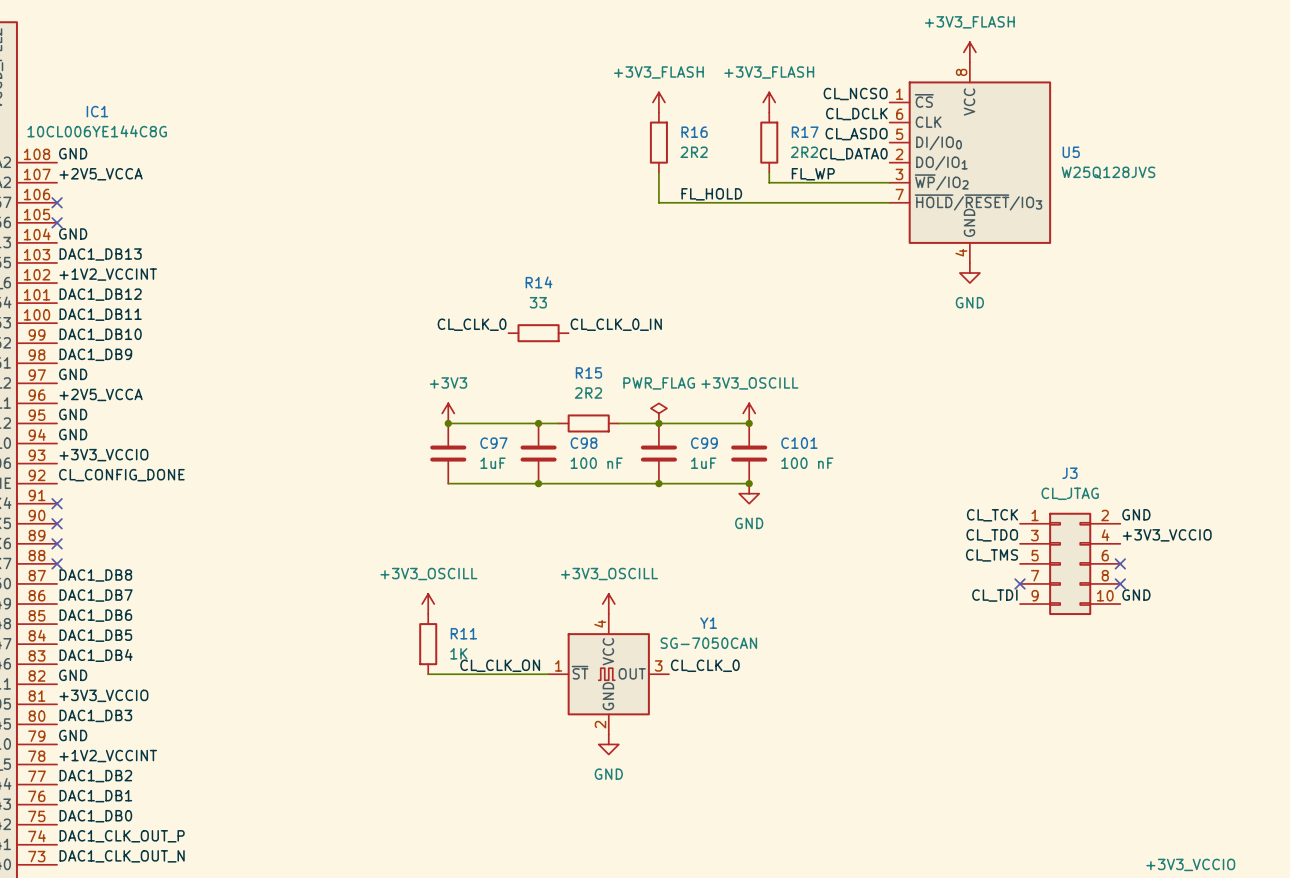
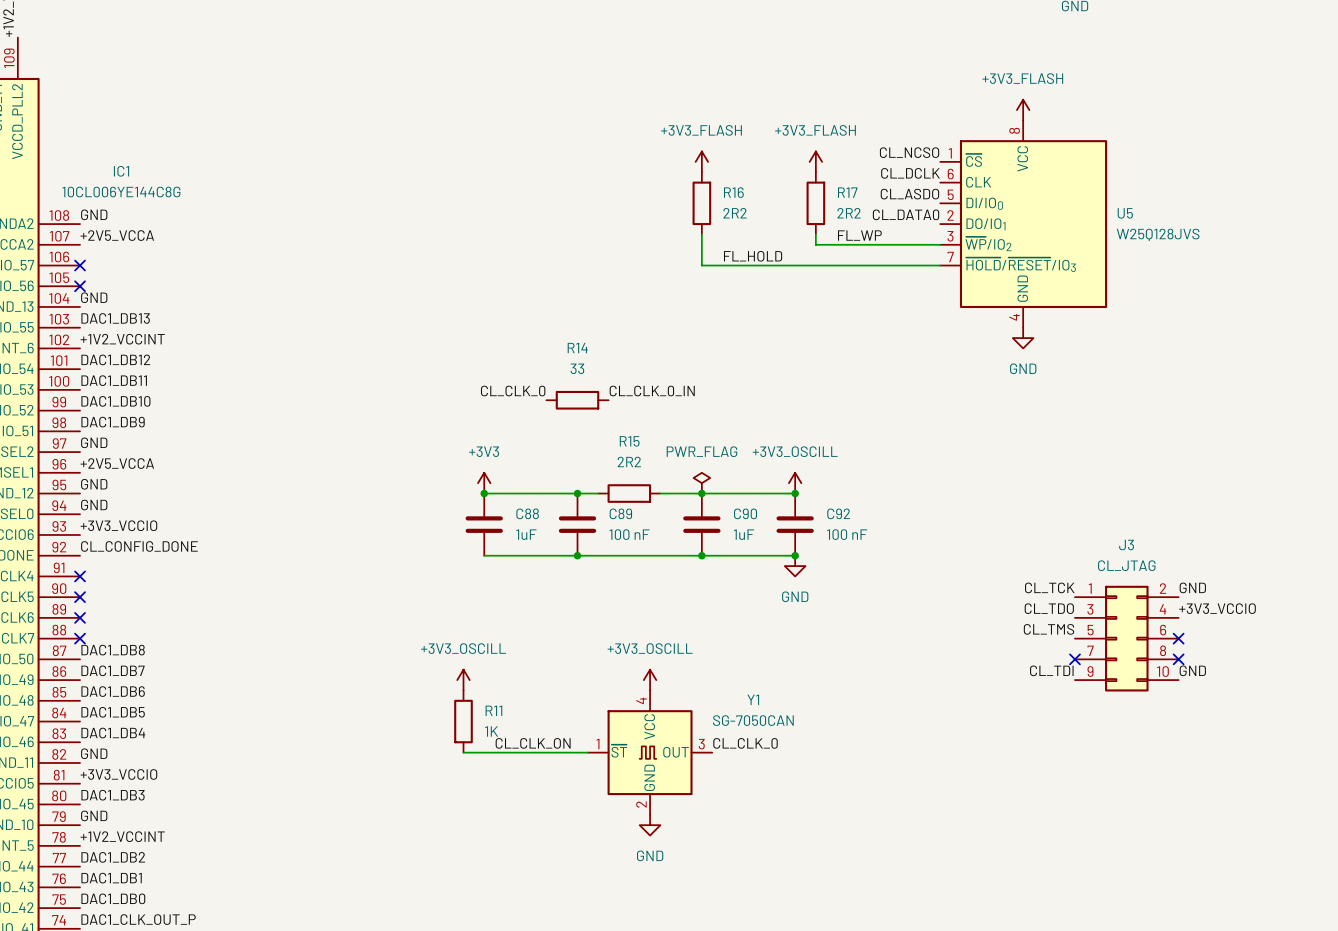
C97 name: C97 (493, 443) -> C88 (527, 513)
C98 name: C98 (584, 443) -> C89 (620, 513)
C99 name: C99 (704, 443) -> C90 (745, 513)
C101 name: C101 (799, 443) -> C92 (838, 513)

